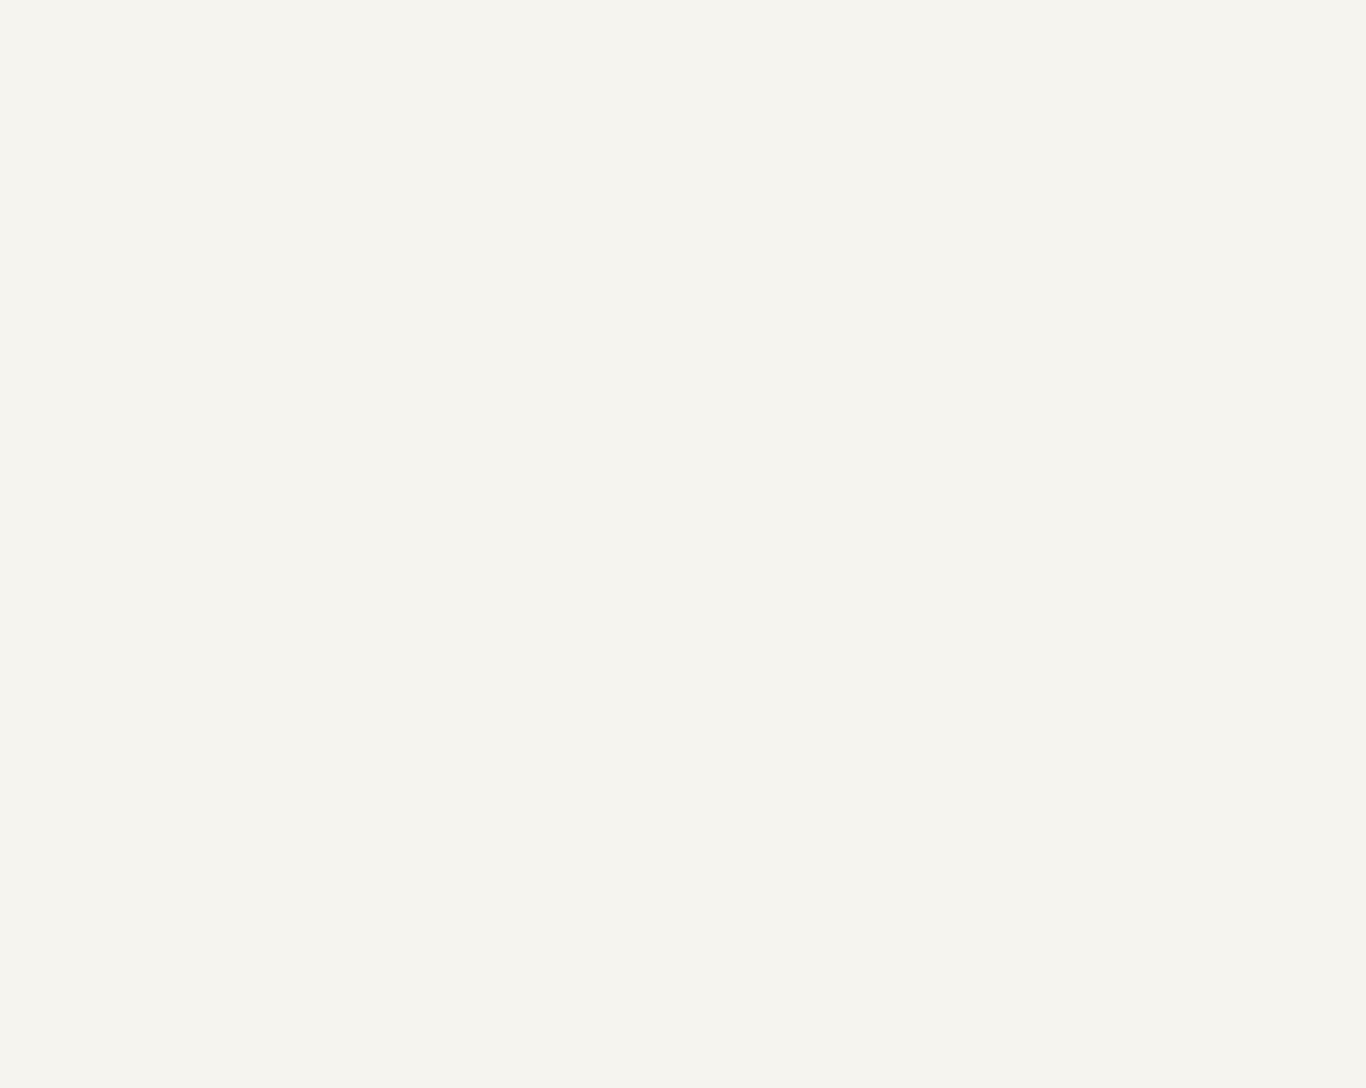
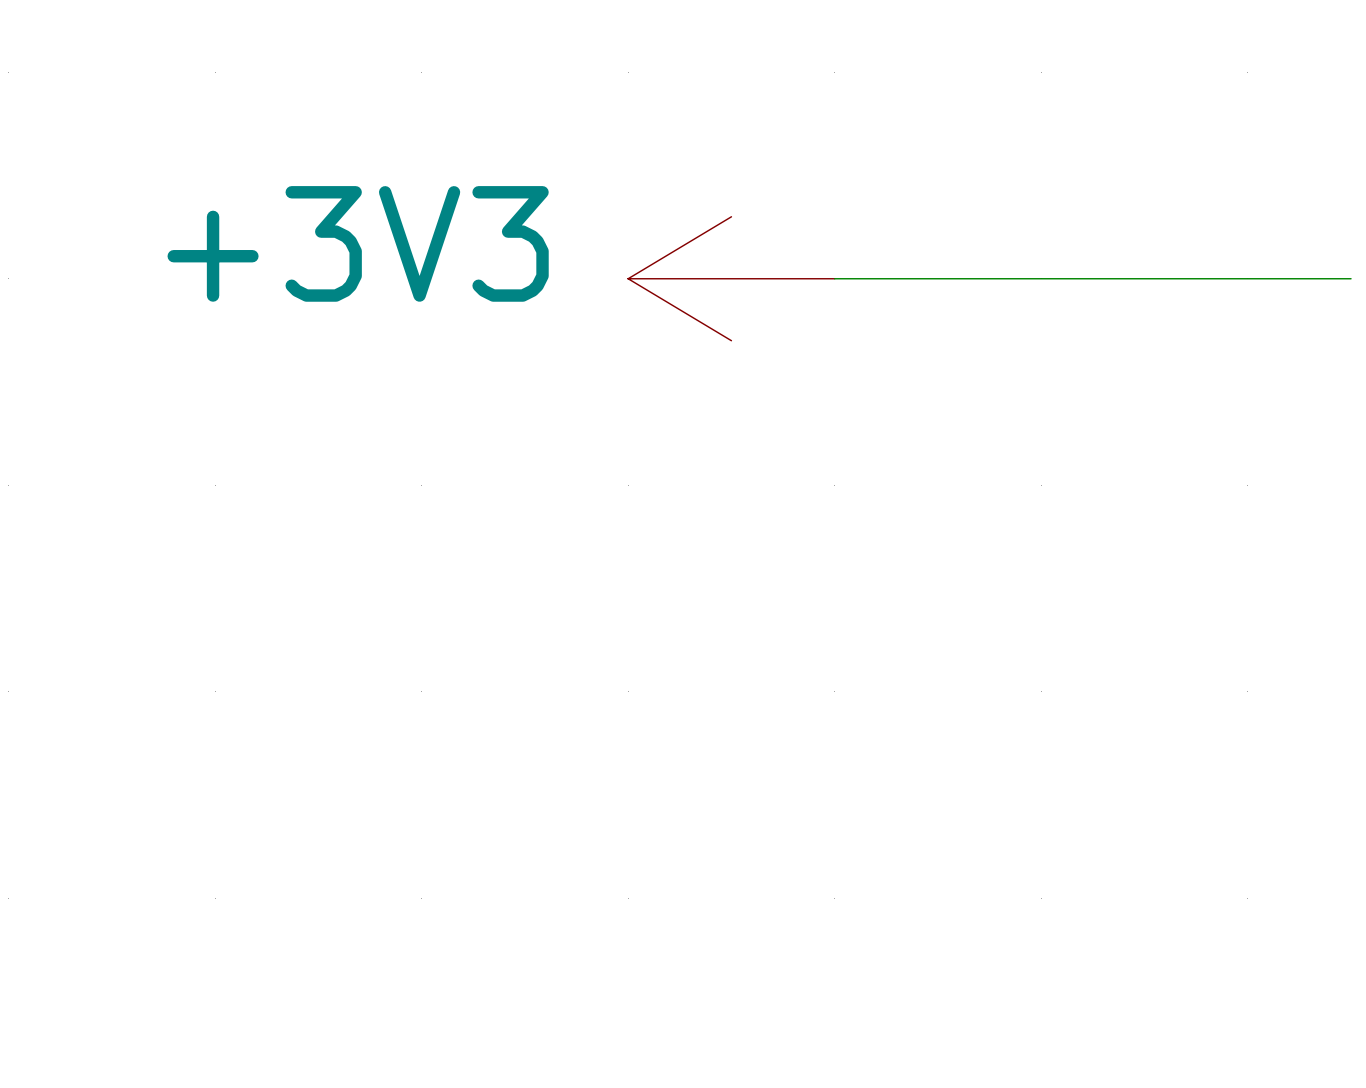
power symbol: none -> +3V3 (731, 278)
wire: none -> (834, 278) (1351, 278)

